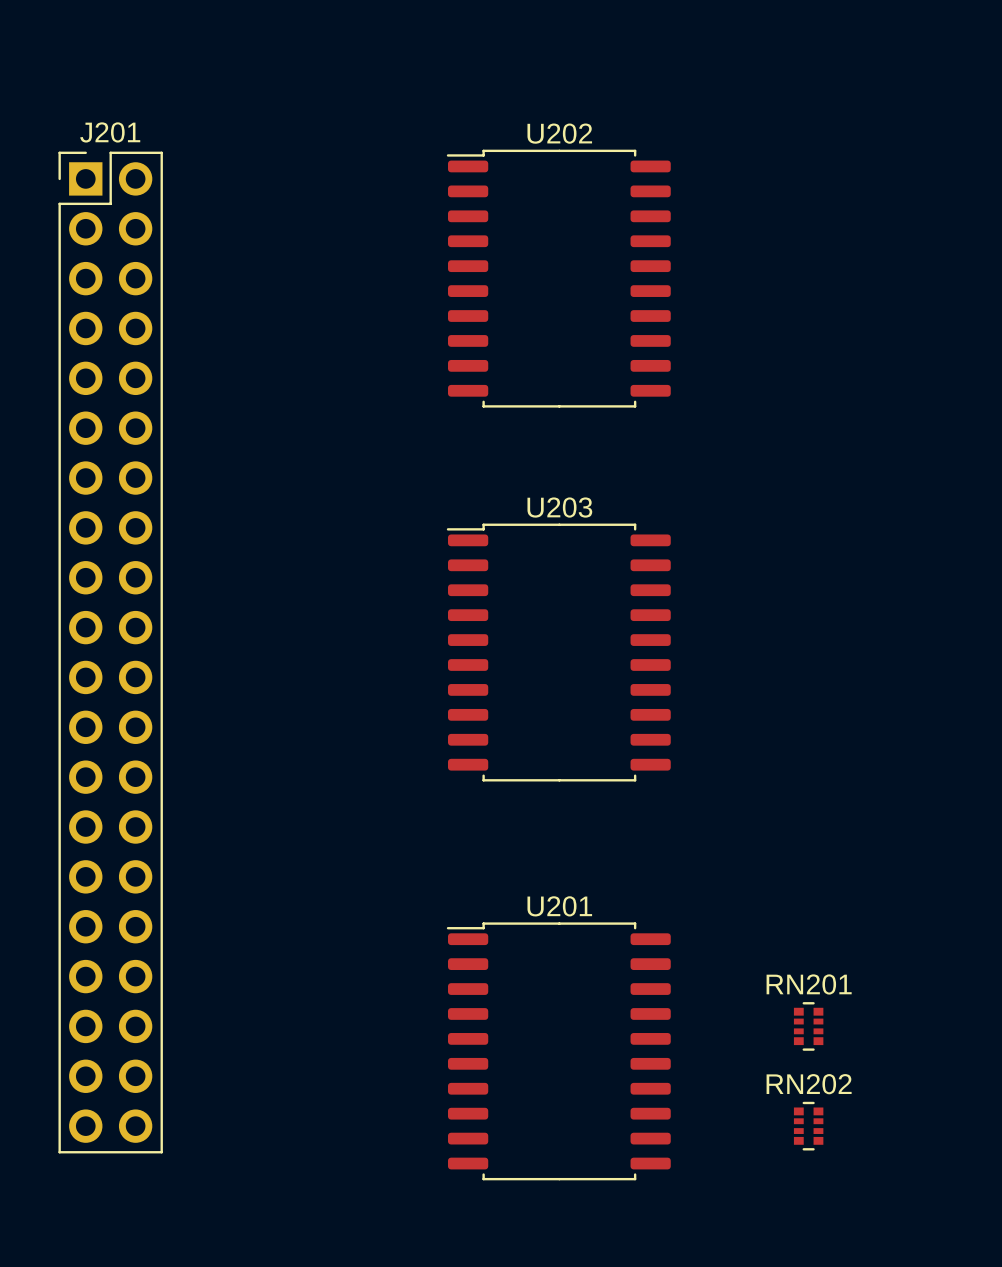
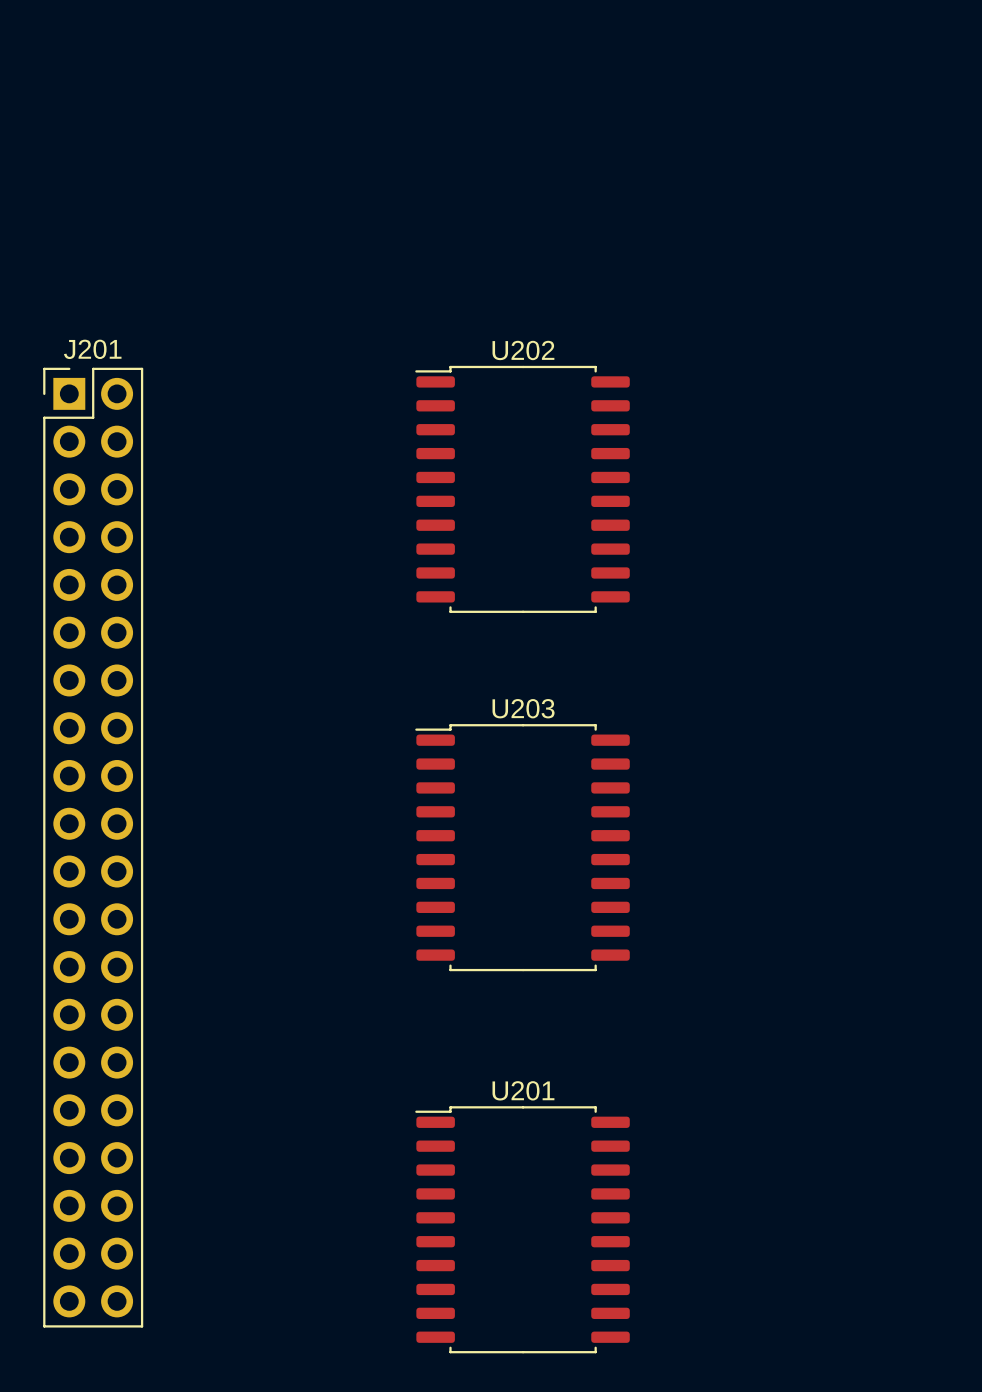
RN201: (808, 1026) -> none
RN202: (808, 1126) -> none

